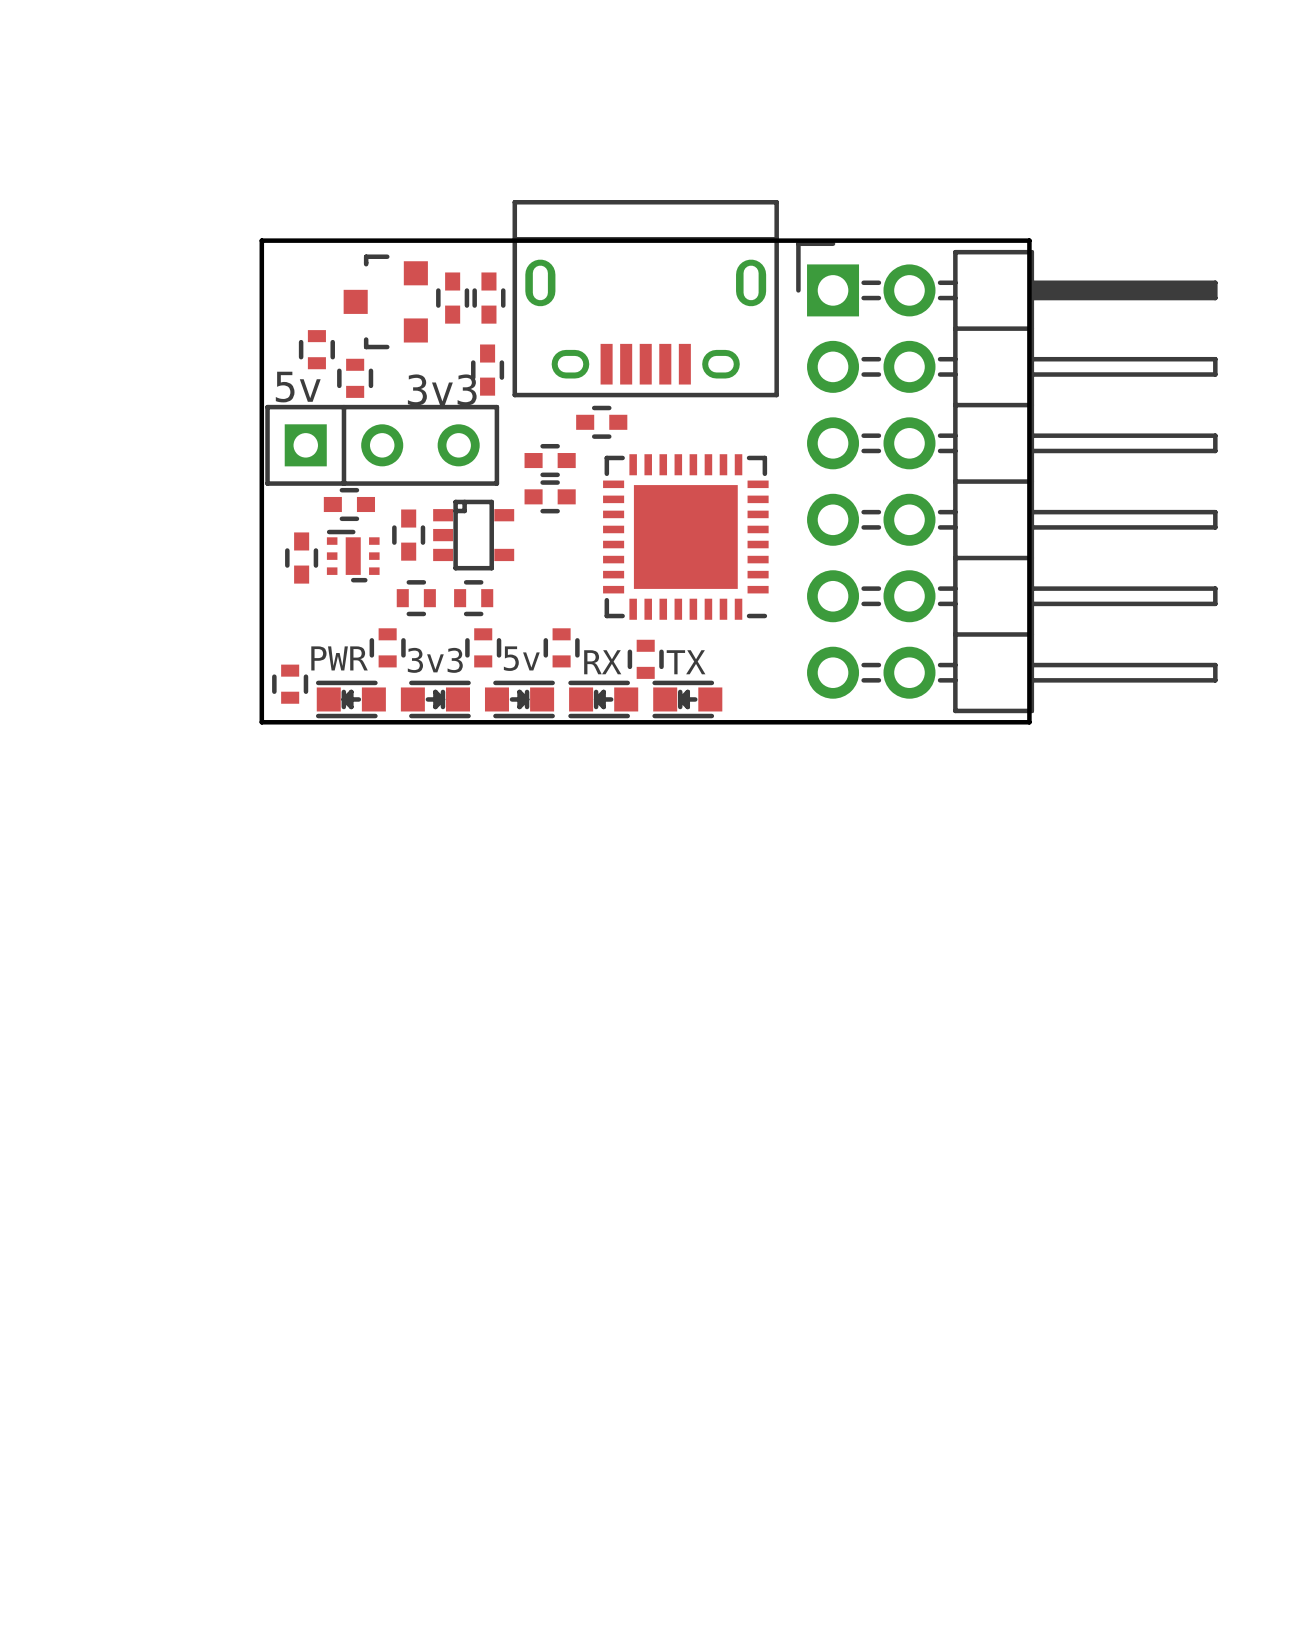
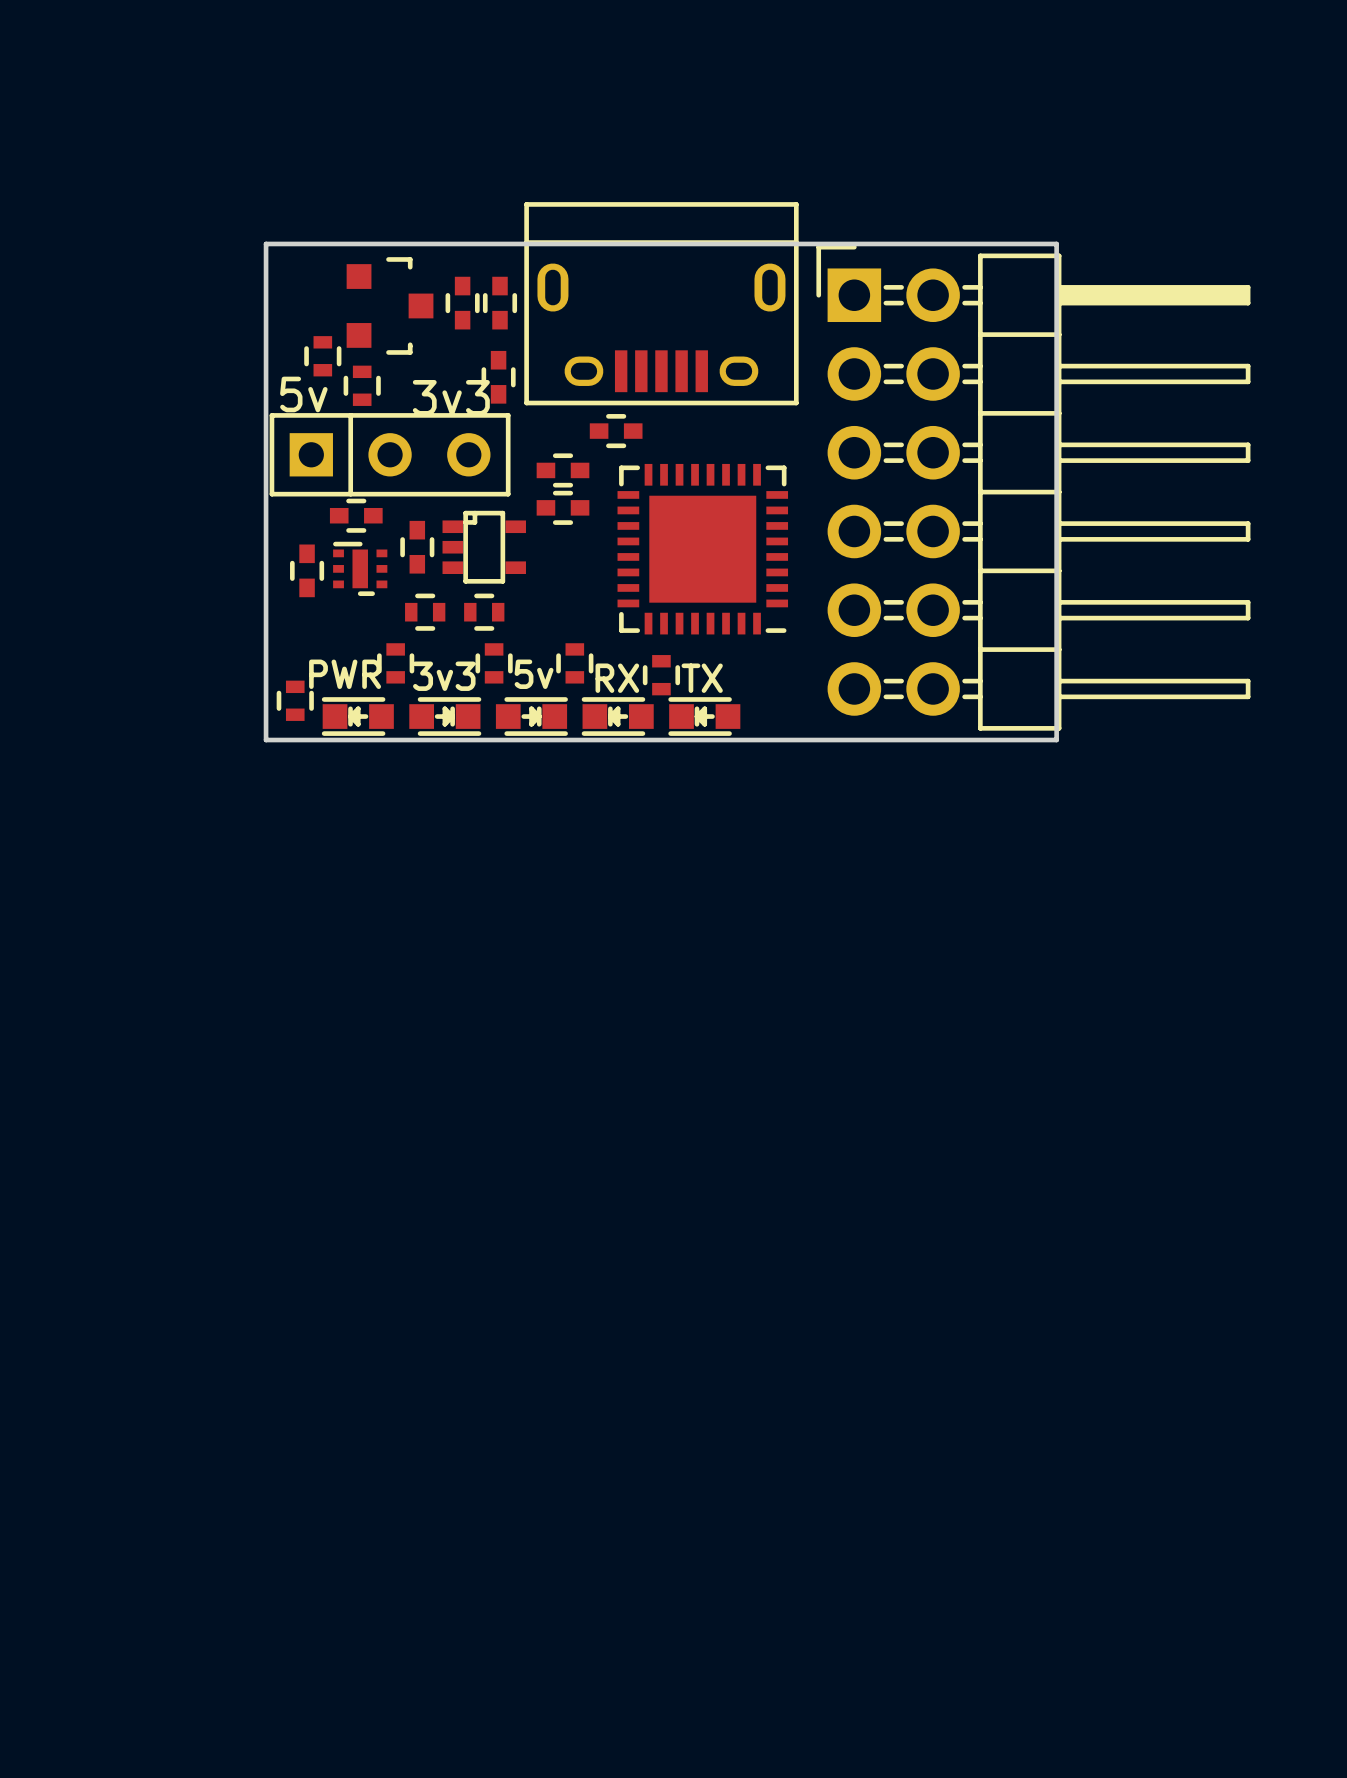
part rotation: 0° (385, 301) -> 180° (390, 305)

